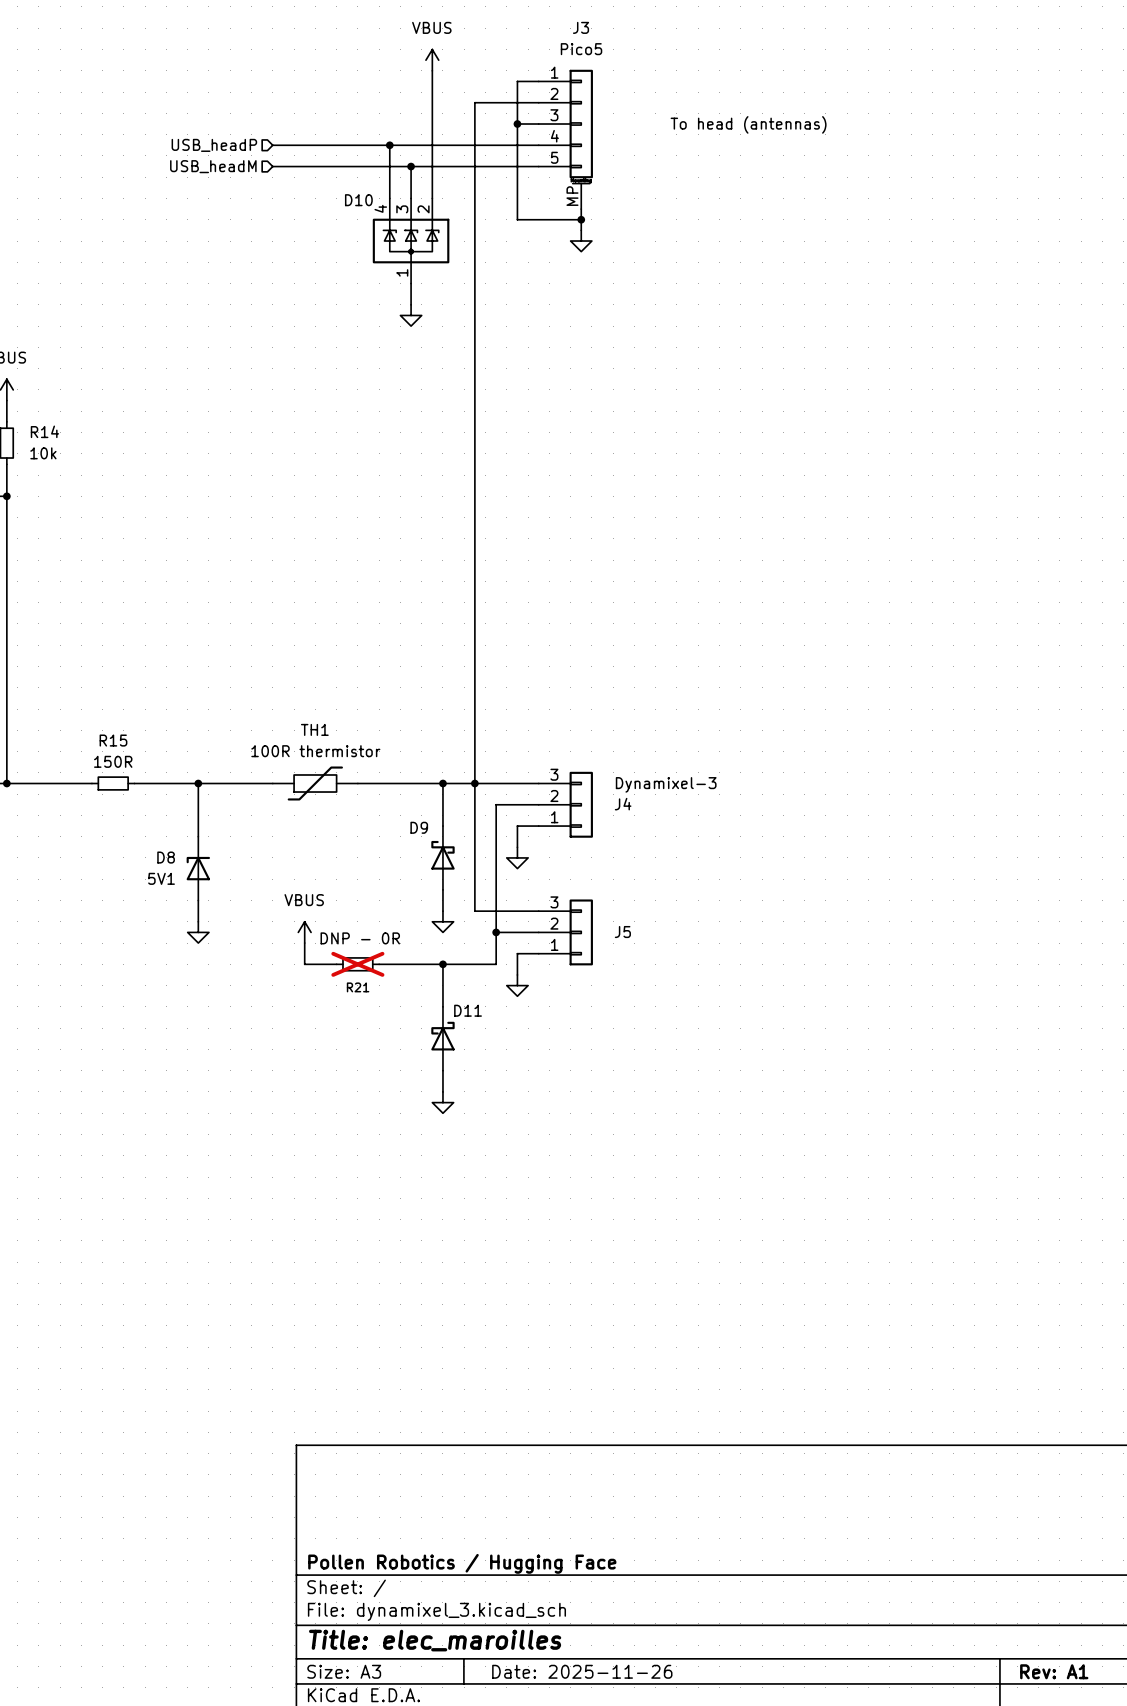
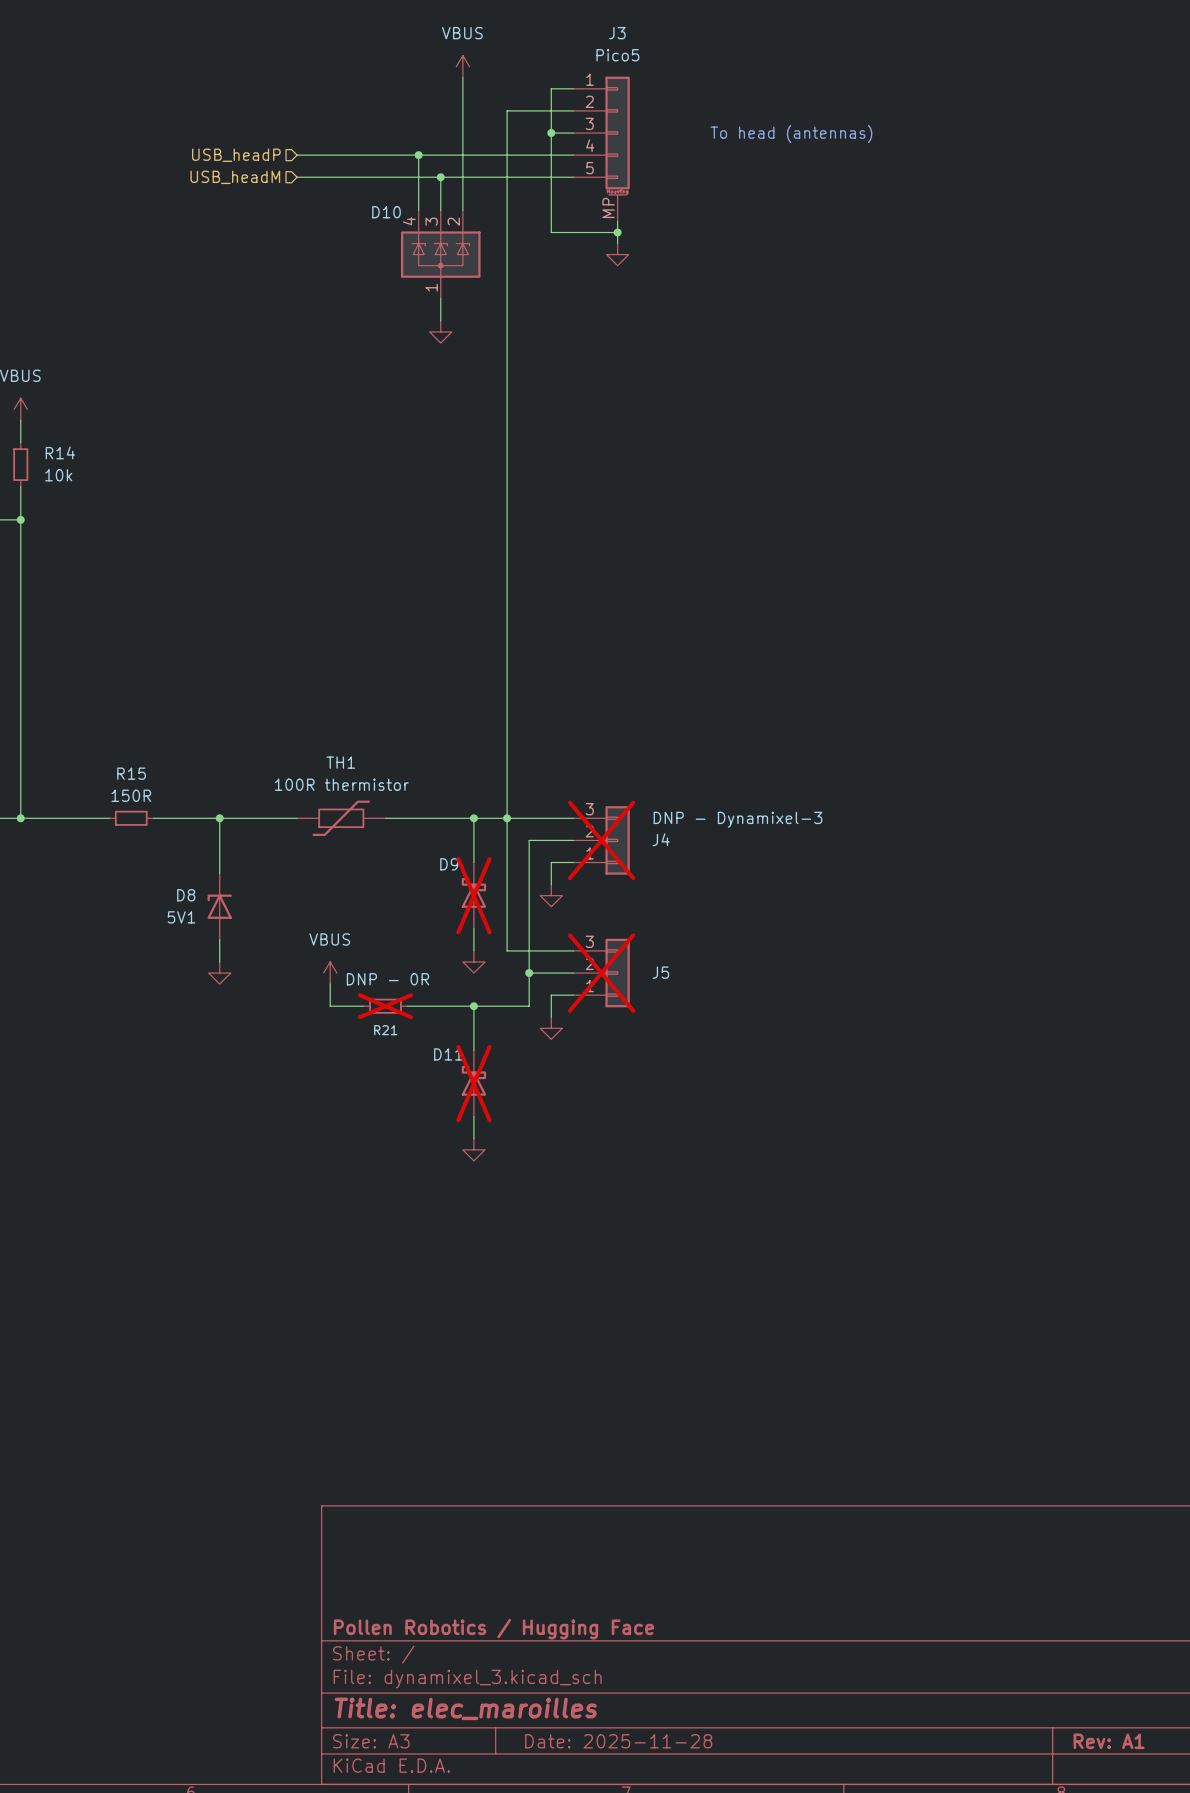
J4 value: Dynamixel-3 (666, 784) -> DNP - Dynamixel-3 (737, 819)
J4 do-not-place cross: none -> (601, 840)
D9 do-not-place cross: none -> (473, 895)
J5 do-not-place cross: none -> (601, 973)
D11 flip: as is (442, 1036) -> left-right (473, 1080)
D11 do-not-place cross: none -> (473, 1083)
title block: Date: 2025-11-26 (582, 1671) -> Date: 2025-11-28 (618, 1741)

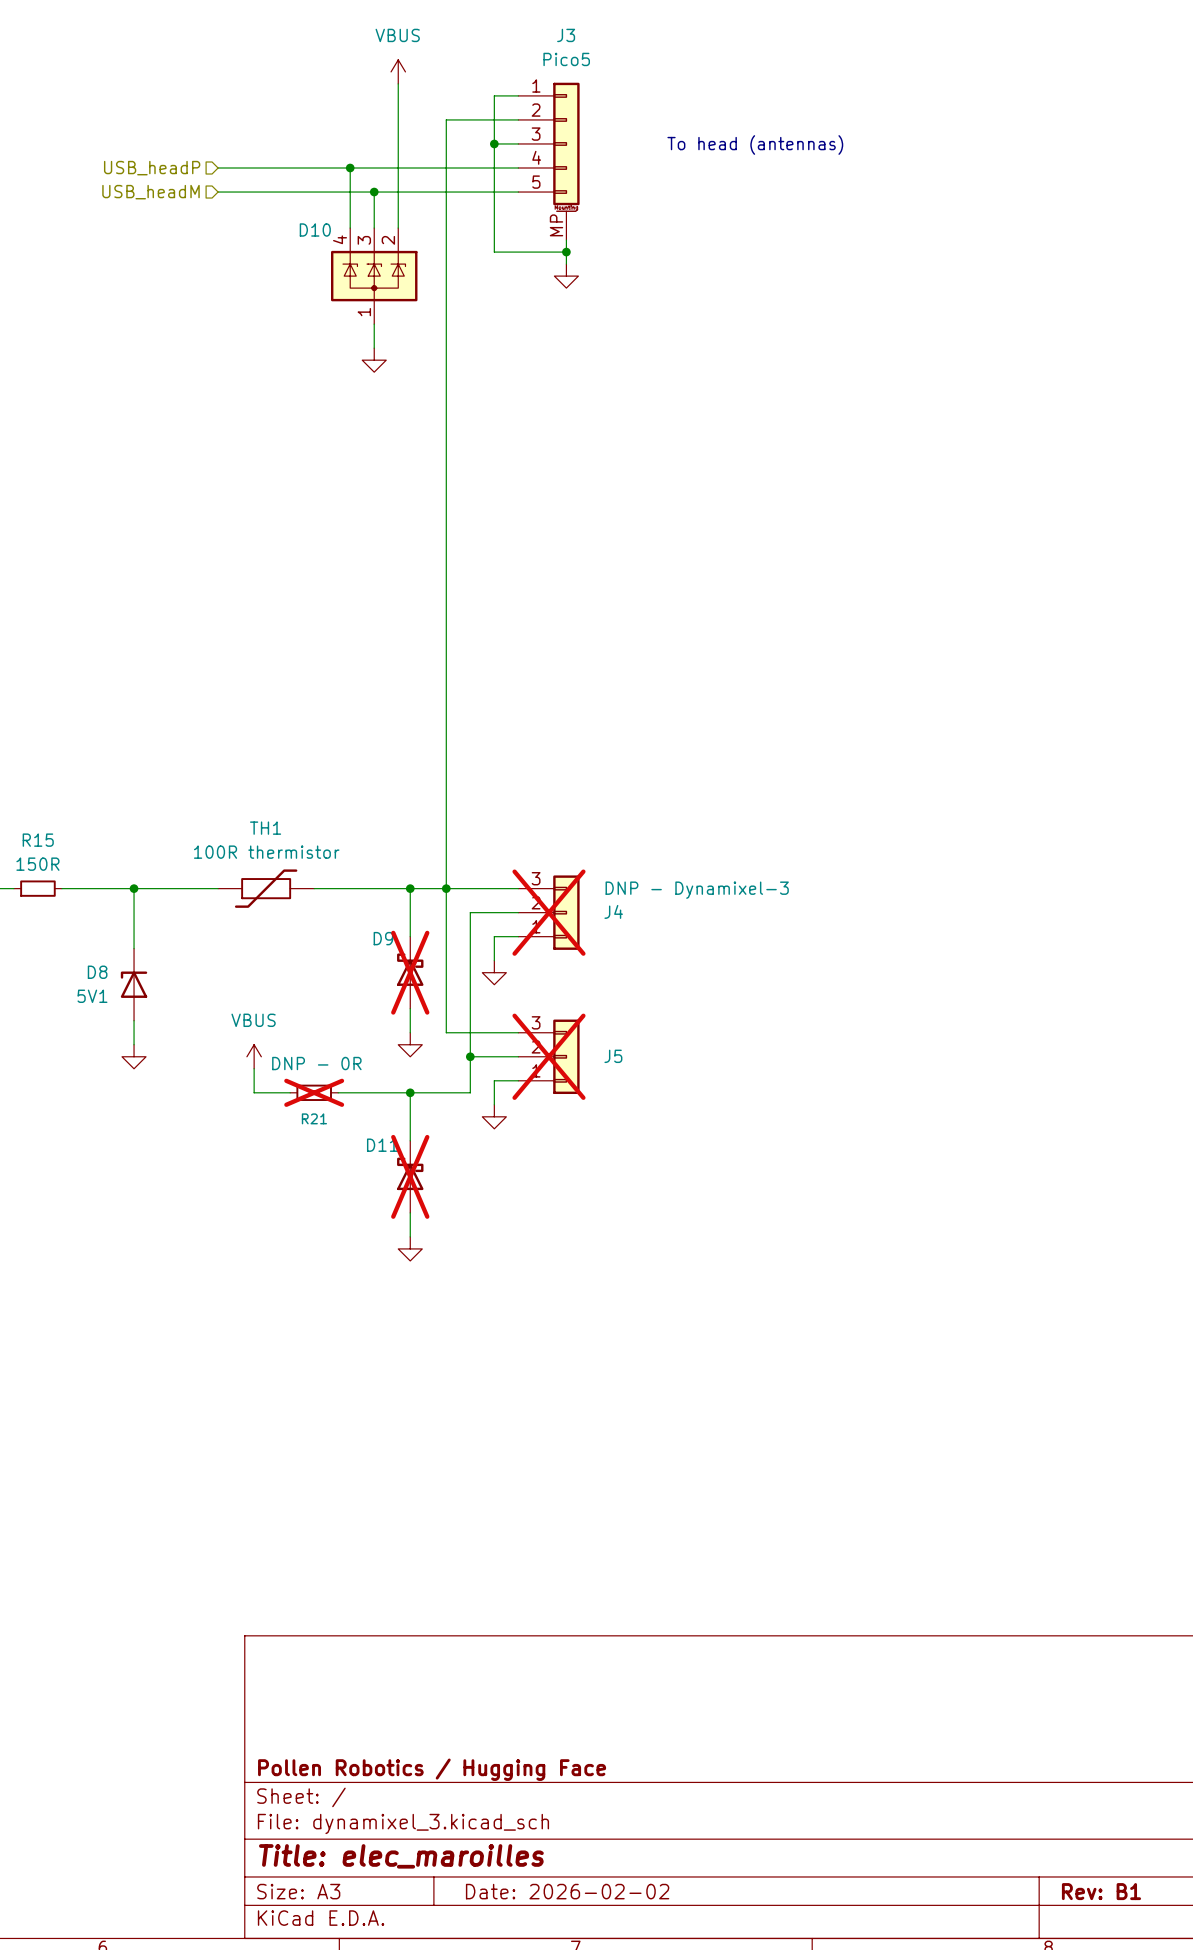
title block: Date: 2025-11-28 (618, 1741) -> Date: 2026-02-02 (567, 1891)
title block: Rev: A1 (1109, 1741) -> Rev: B1 (1101, 1891)

